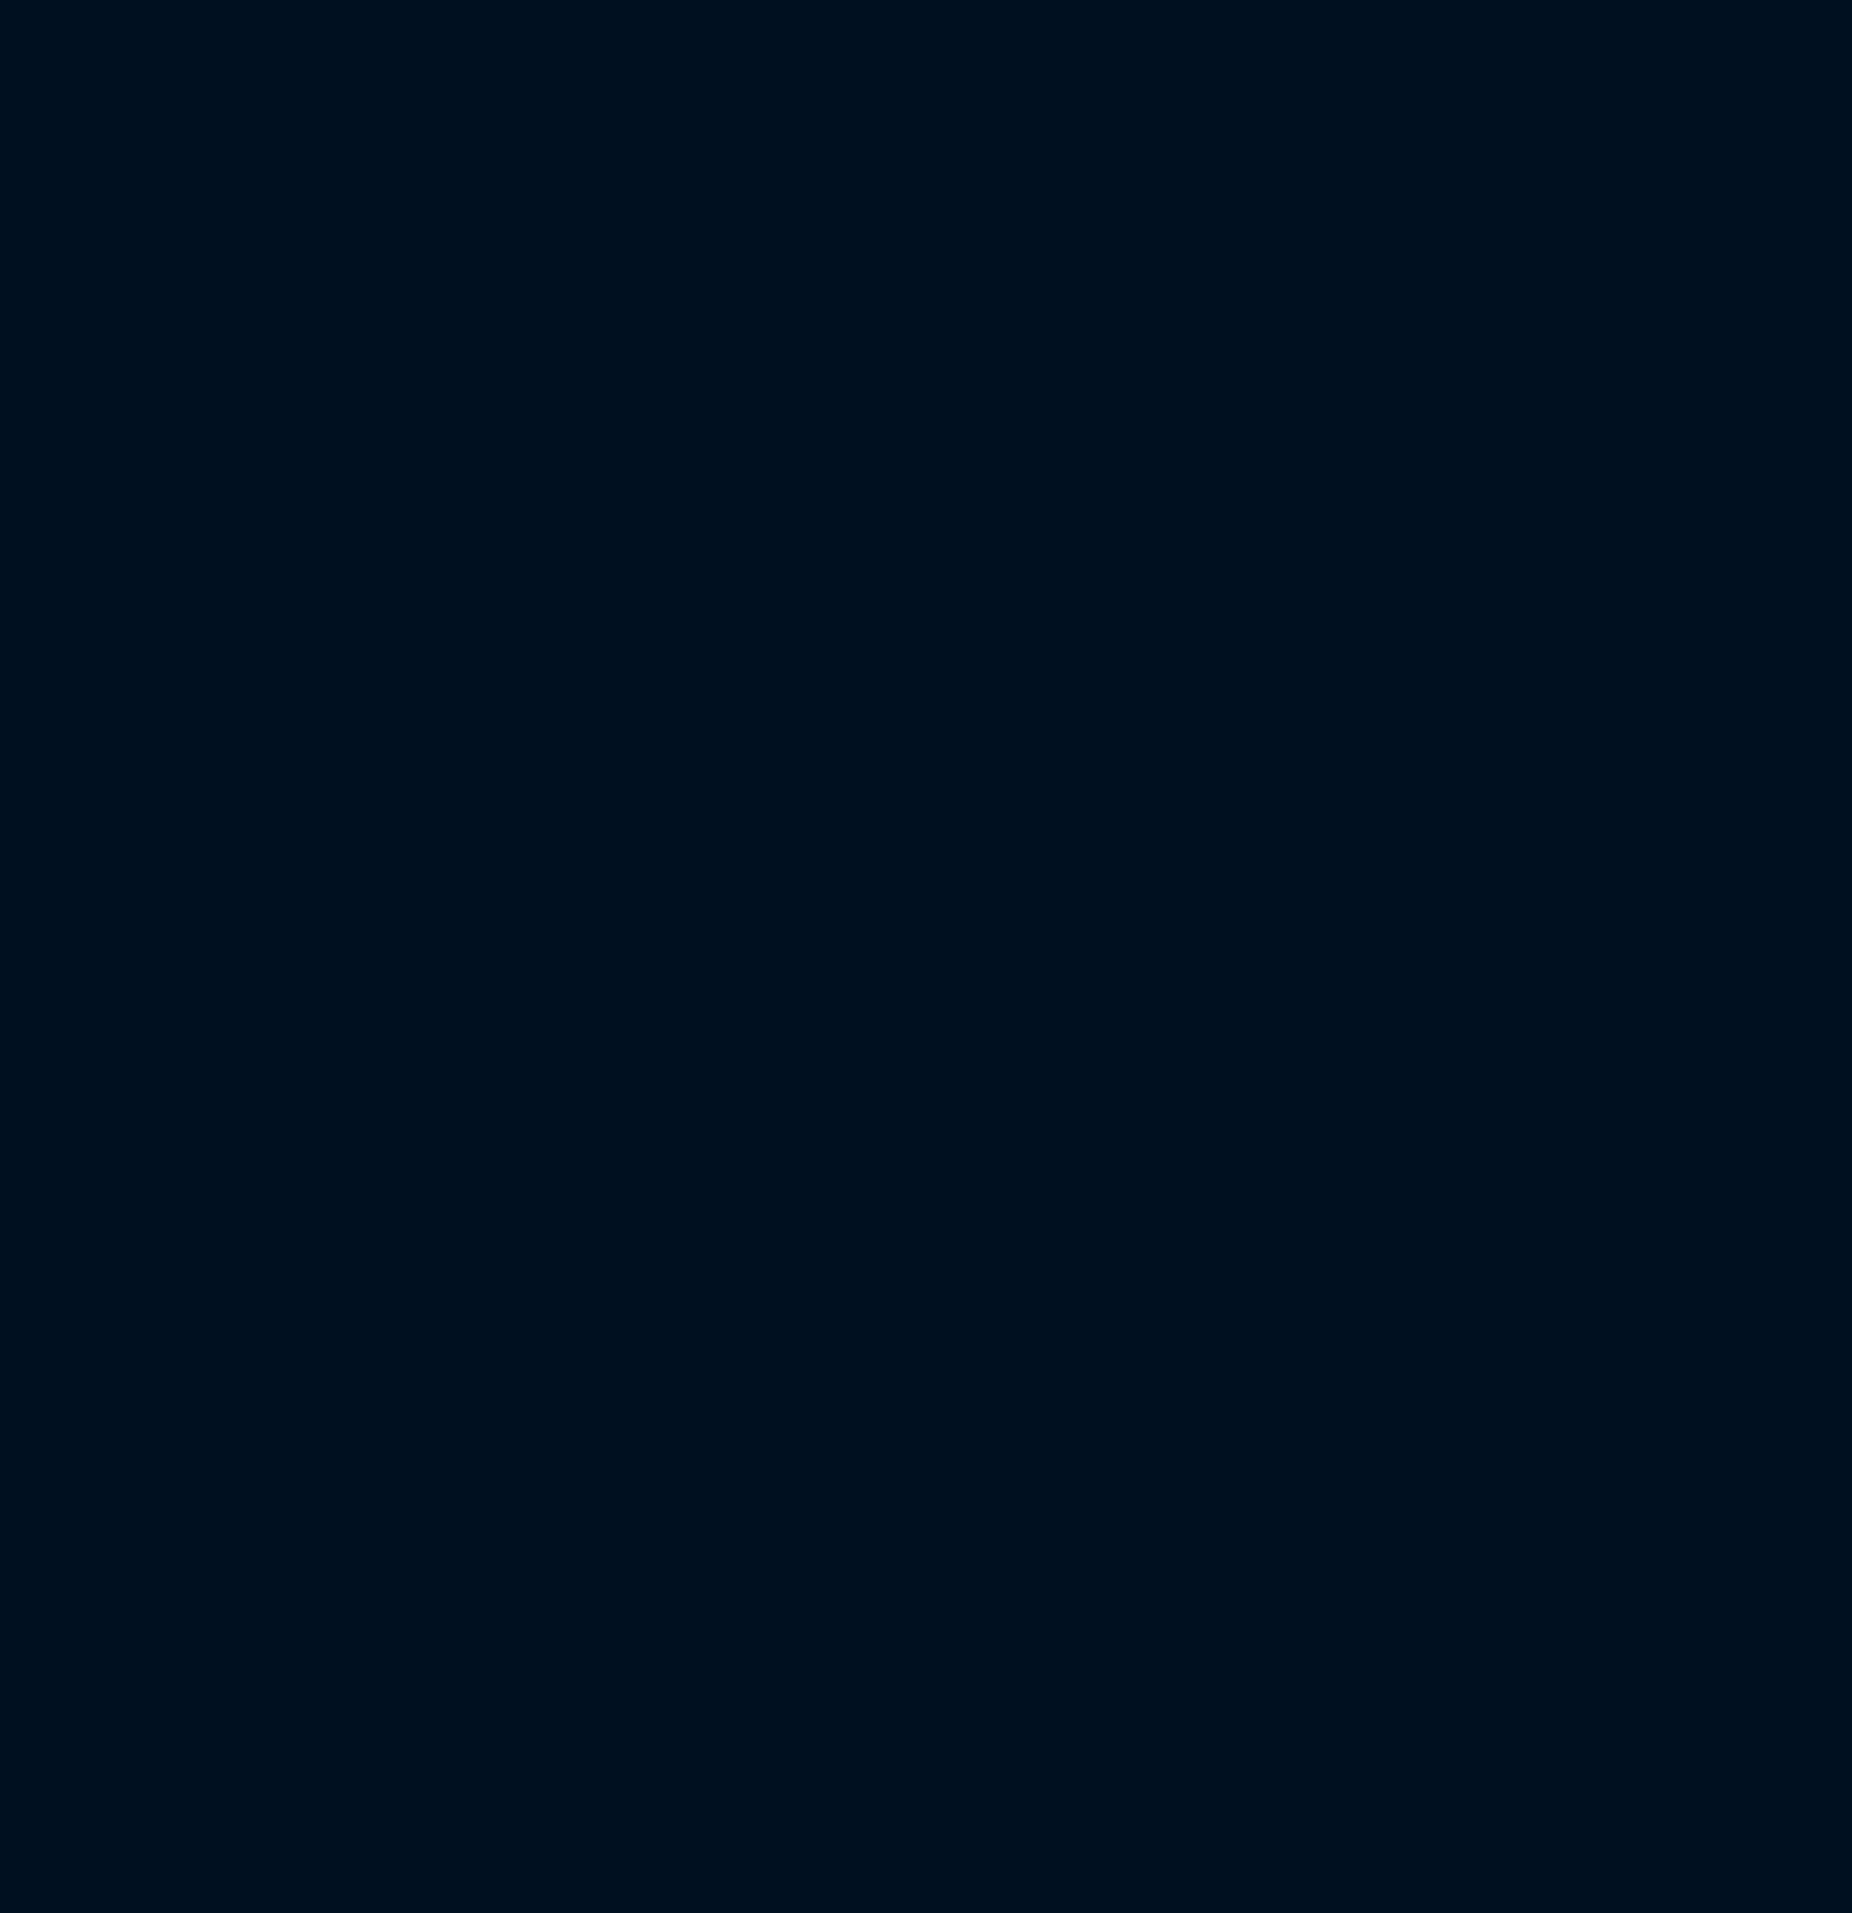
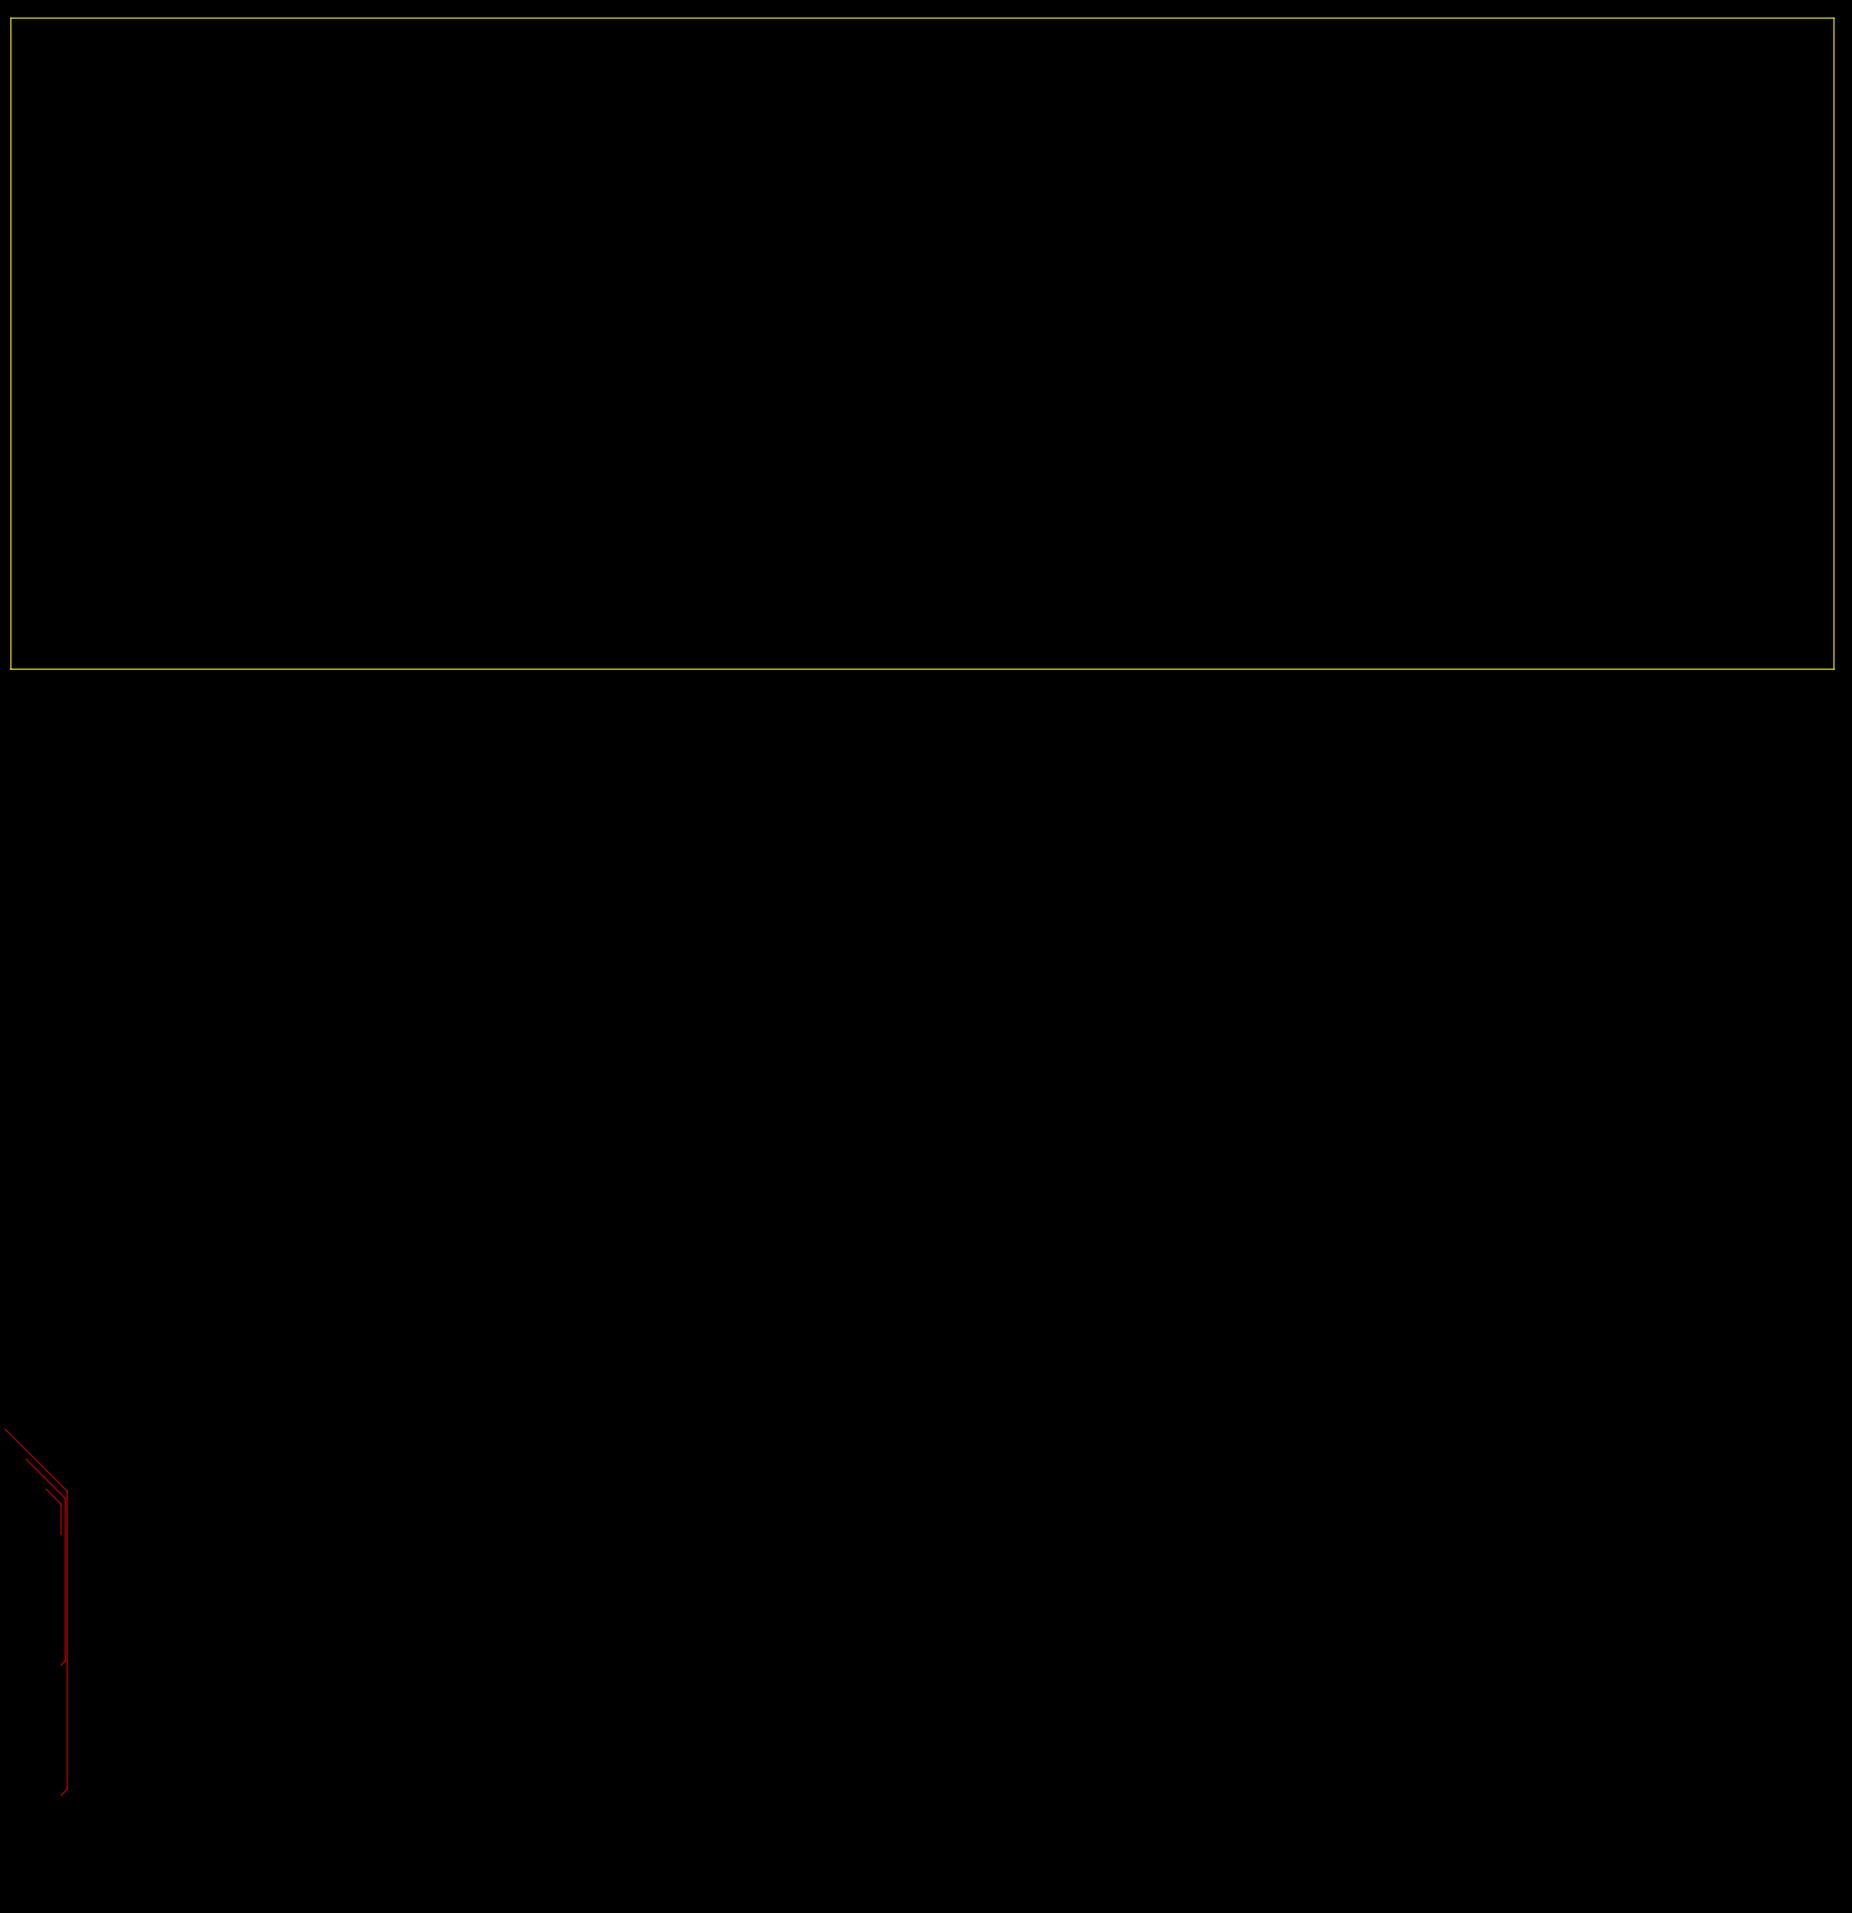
board edge: none -> (10, 18) (1833, 18) (1833, 669) (10, 669) (10, 18)
track: none -> (5, 1429) (67, 1491) (67, 1789) (61, 1795)
track: none -> (26, 1459) (65, 1498) (65, 1660) (61, 1665)
track: none -> (46, 1489) (61, 1504) (61, 1534)

